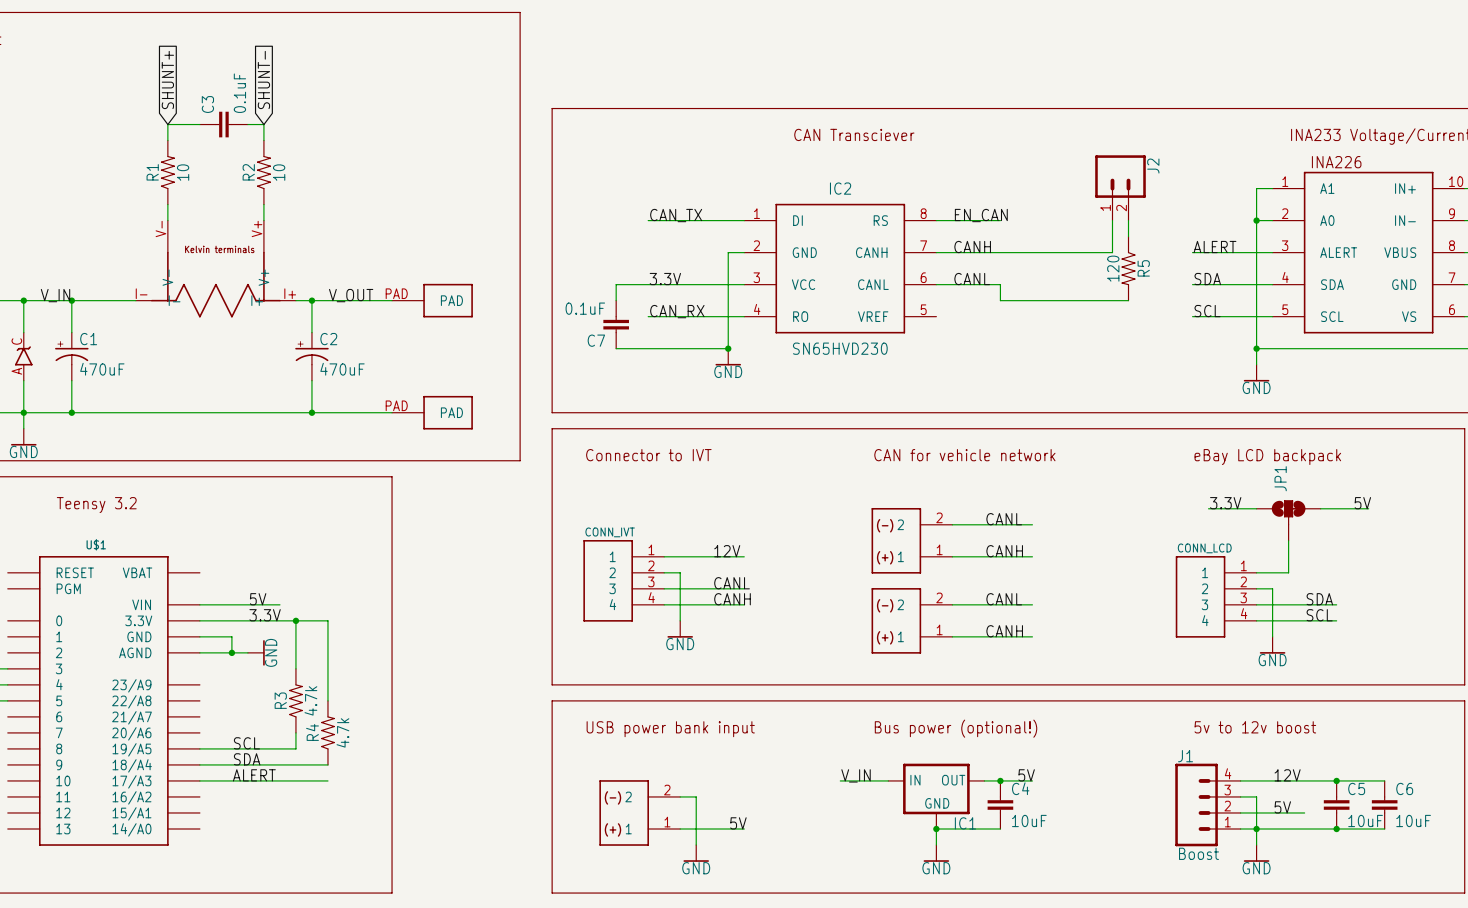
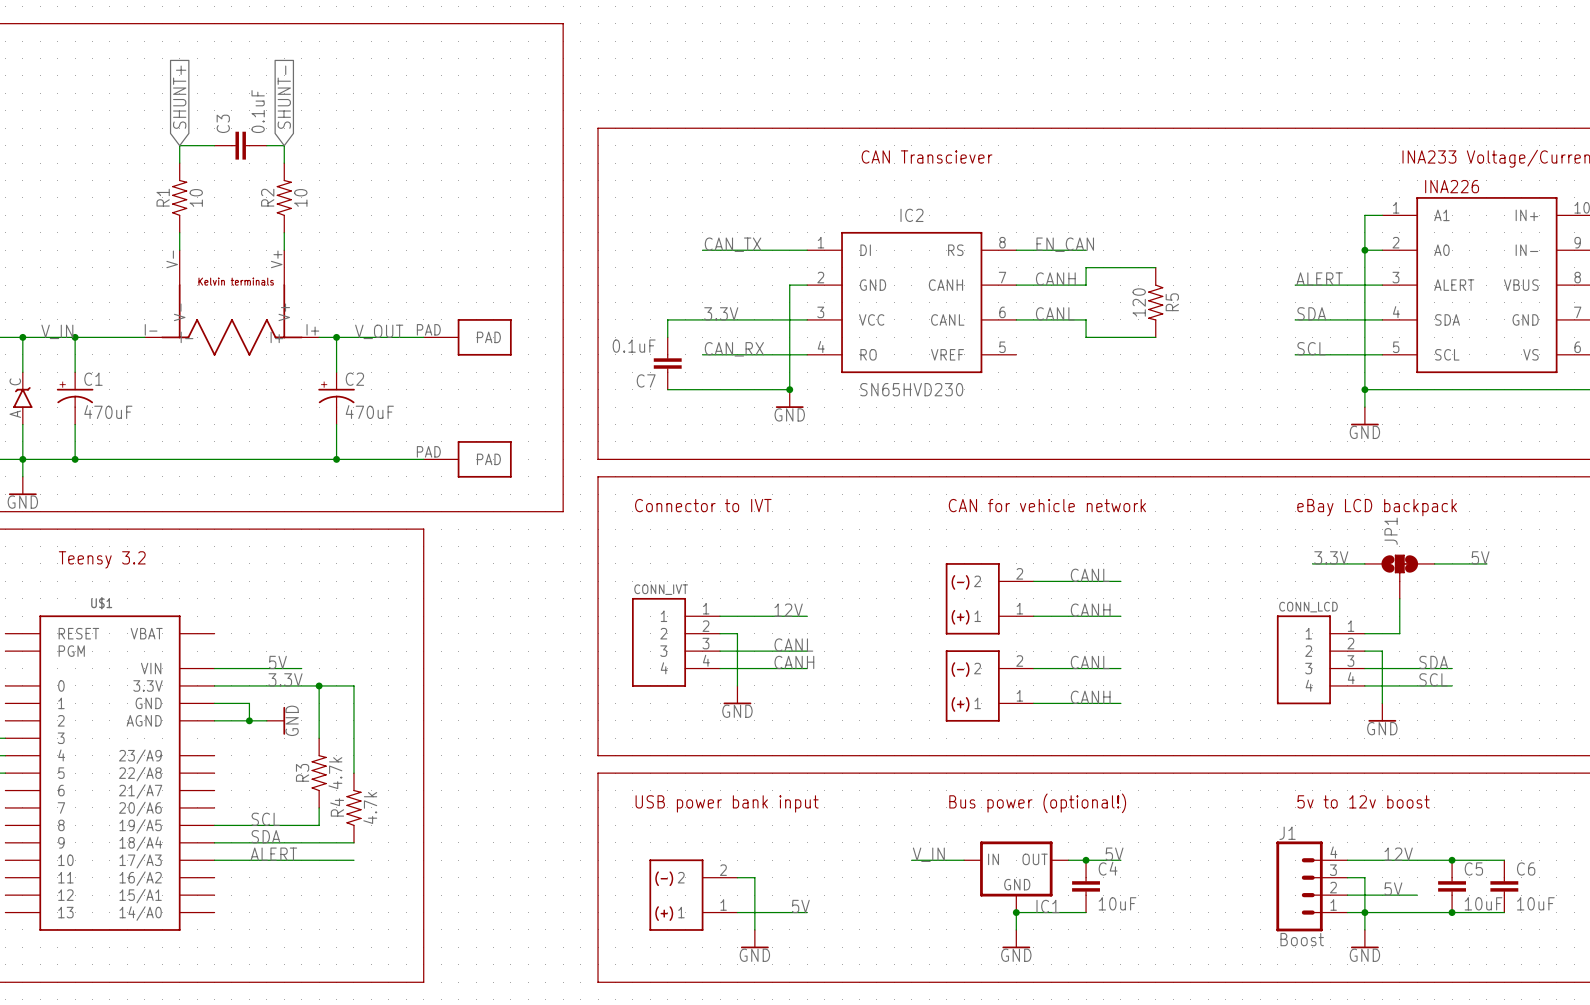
J2: (1120, 187) -> none
wire: (1112, 220) (1112, 252) (1000, 252) -> (1155, 267) (1086, 267) (1086, 285)
wire: (1128, 220) (1128, 236) -> none
R5 position: (1128, 268) -> (1155, 302)
wire: (1064, 300) (1128, 300) -> none

